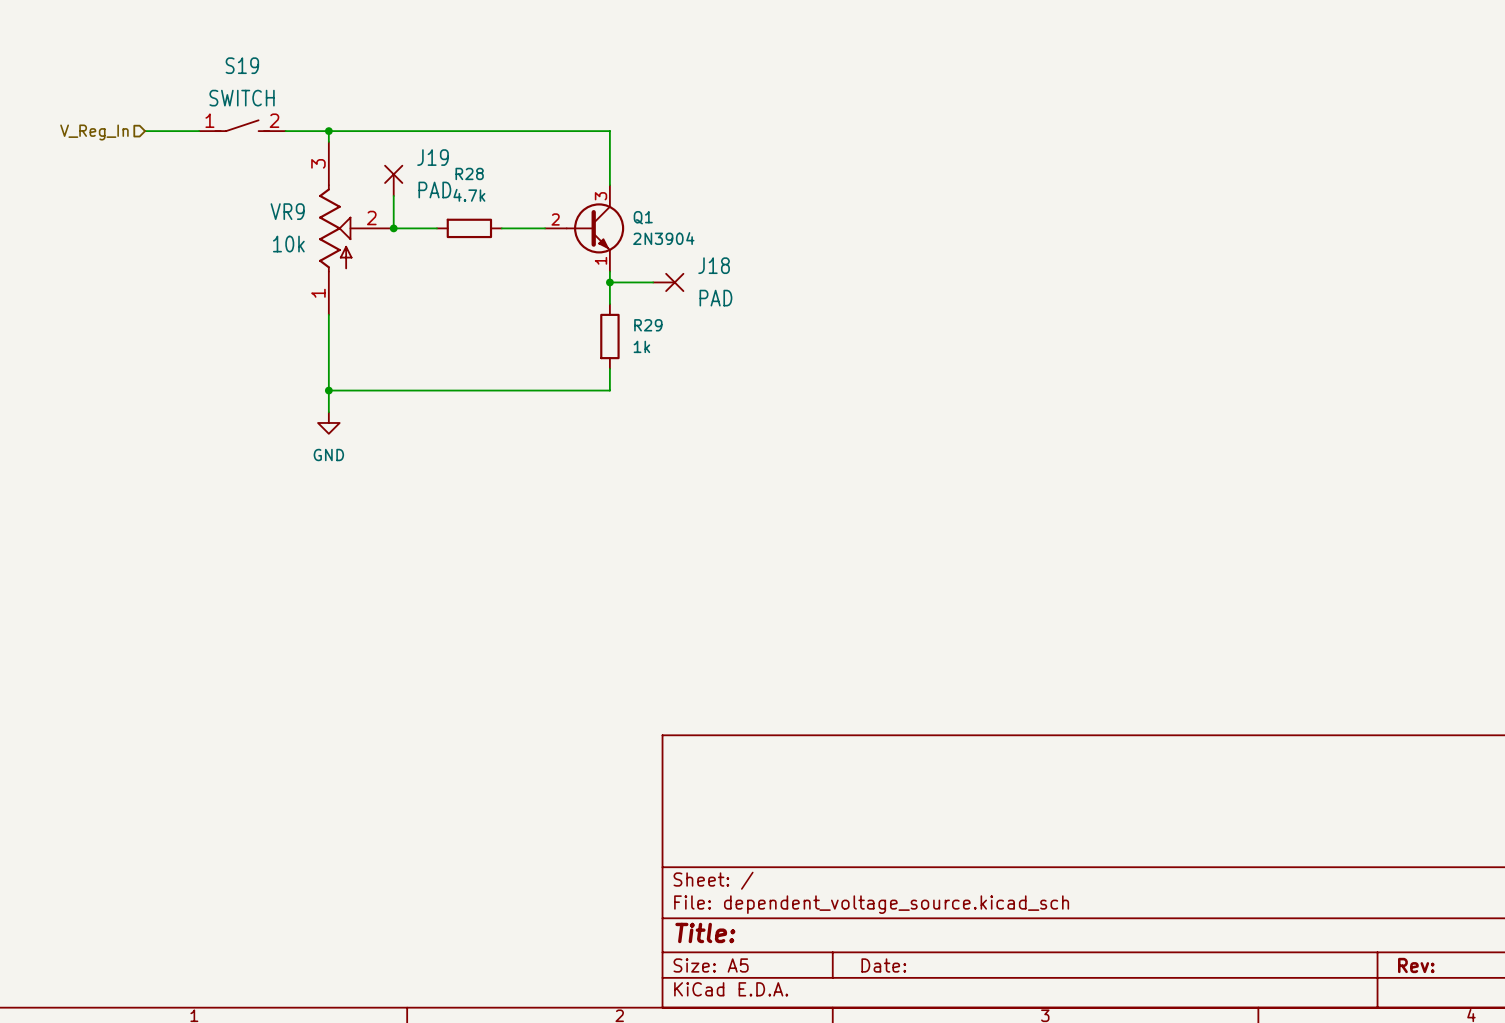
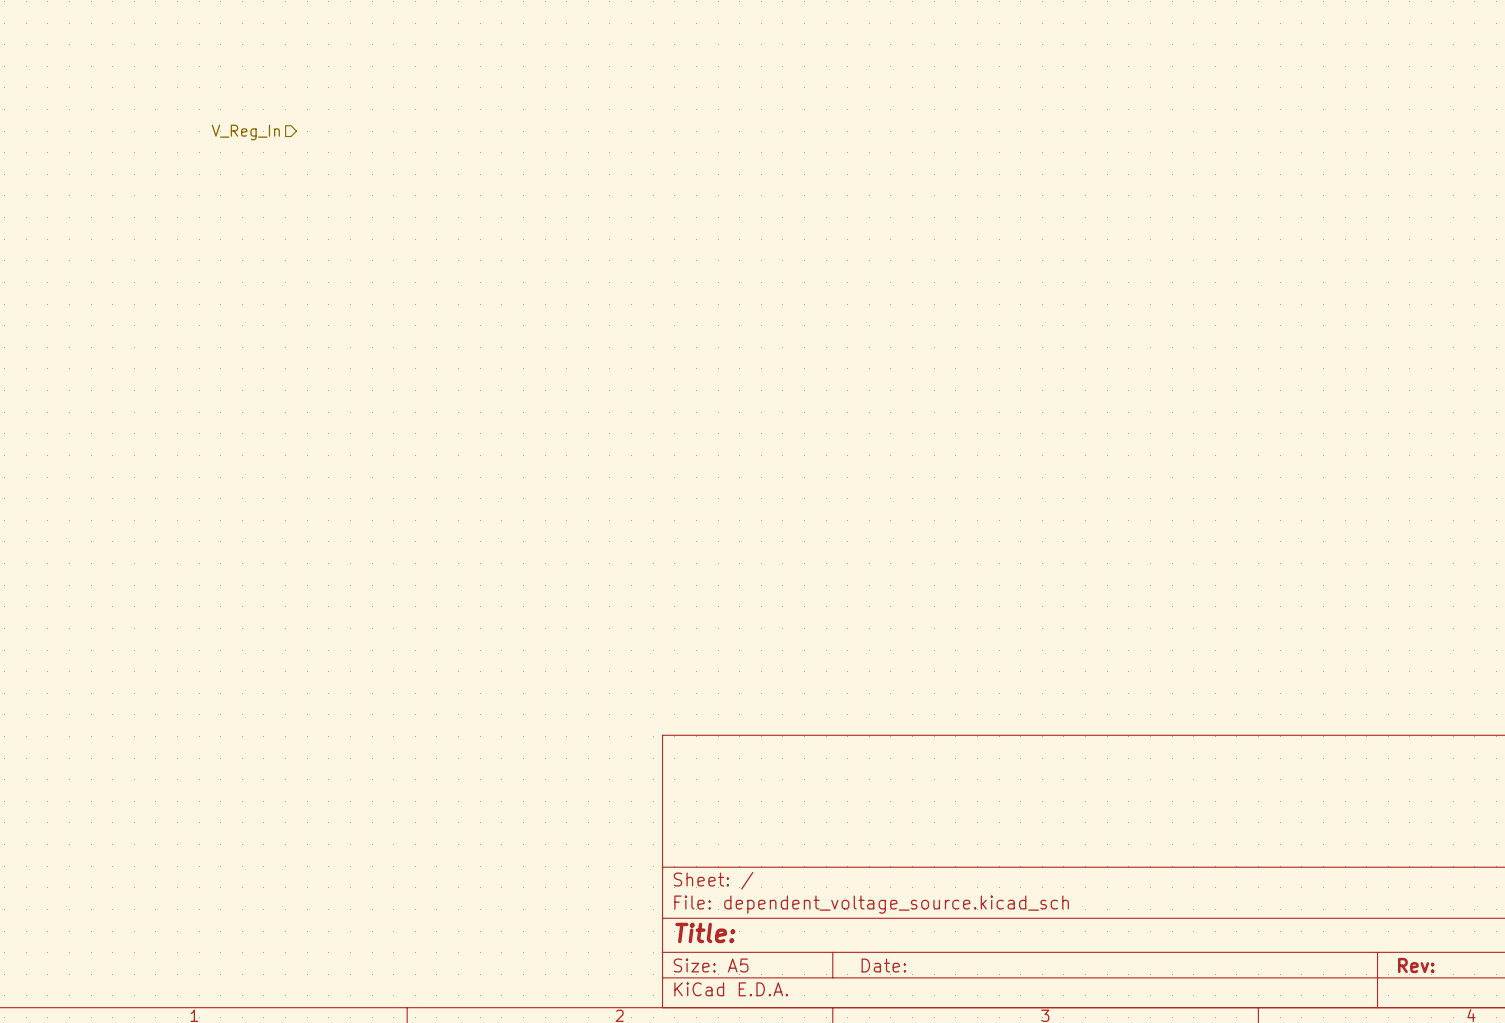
S19: SWITCH (242, 125) -> none
wire: (145, 131) (199, 131) -> none
wire: (285, 131) (609, 131) (609, 185) -> none
wire: (328, 131) (328, 141) -> none
junction: (328, 131) -> none
hierarchical label position: V_Reg_In (94, 132) -> V_Reg_In (245, 132)
J19: PAD (393, 180) -> none
wire: (393, 195) (393, 228) (436, 228) -> none
VR9: 10k (356, 228) -> none
junction: (393, 228) -> none
R28: 4.7k (469, 228) -> none
wire: (501, 228) (545, 228) -> none
Q1: 2N3904 (584, 228) -> none
wire: (609, 271) (609, 304) -> none
wire: (609, 282) (653, 282) -> none
junction: (609, 282) -> none
J18: PAD (668, 282) -> none
wire: (328, 314) (328, 412) -> none
R29: 1k (609, 336) -> none
wire: (609, 368) (609, 390) (328, 390) -> none
junction: (328, 390) -> none
power symbol: GND (328, 422) -> none

